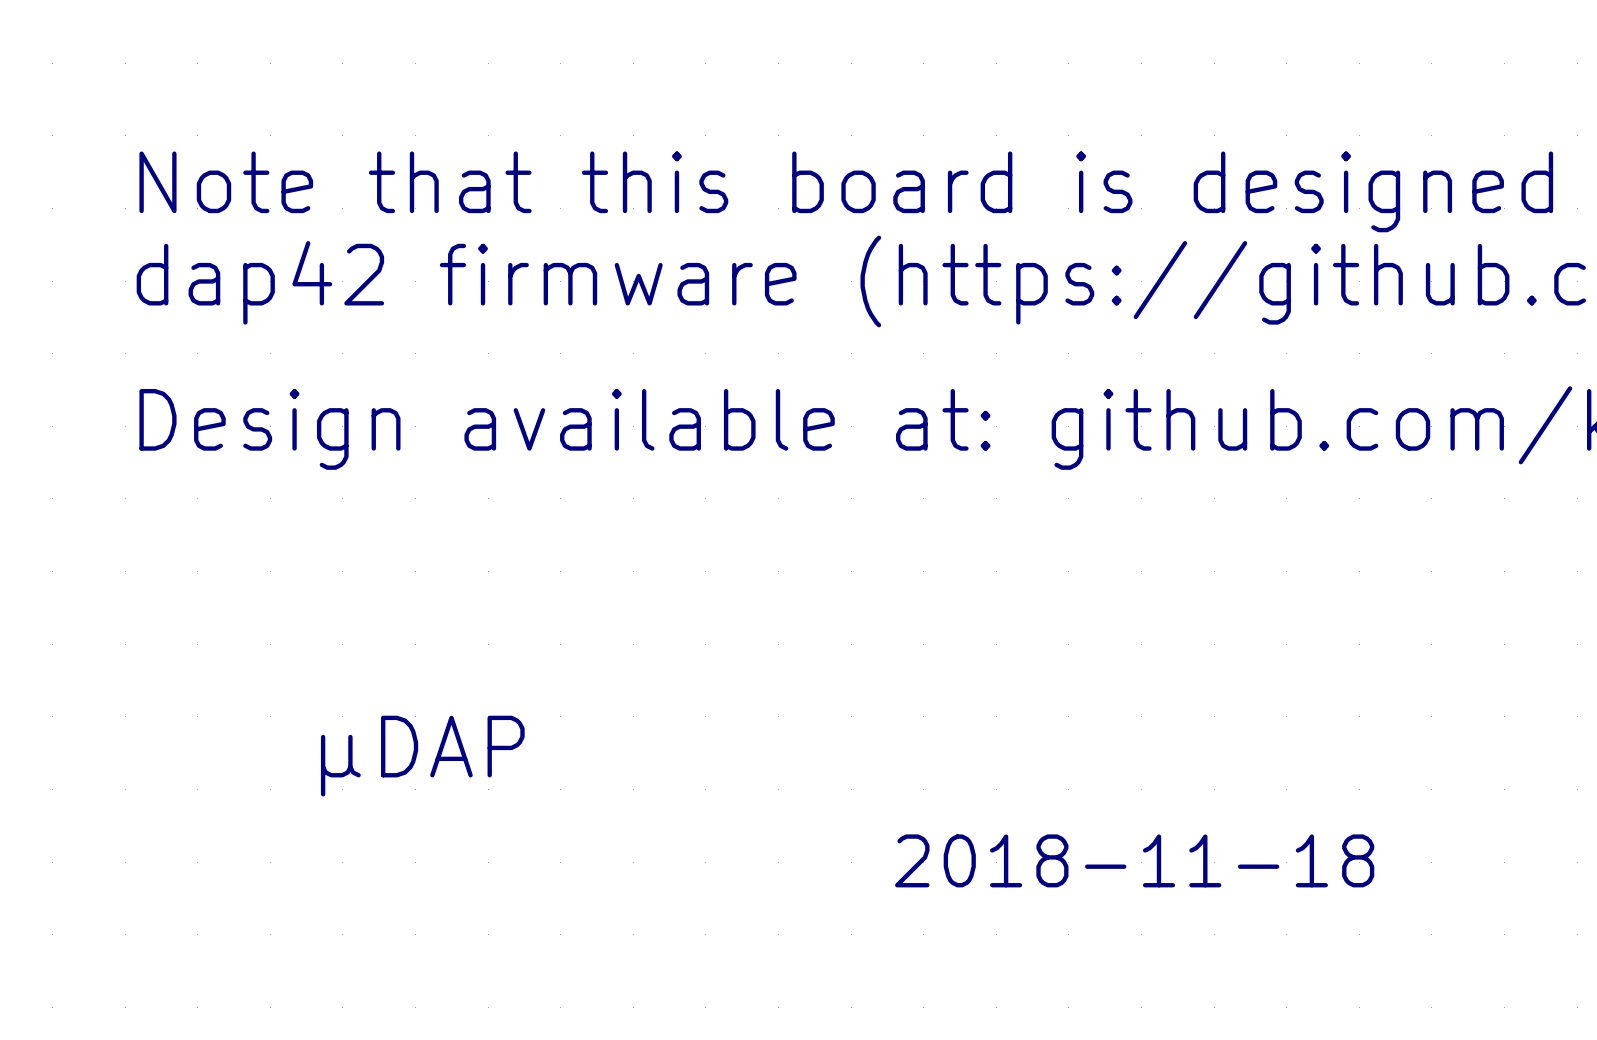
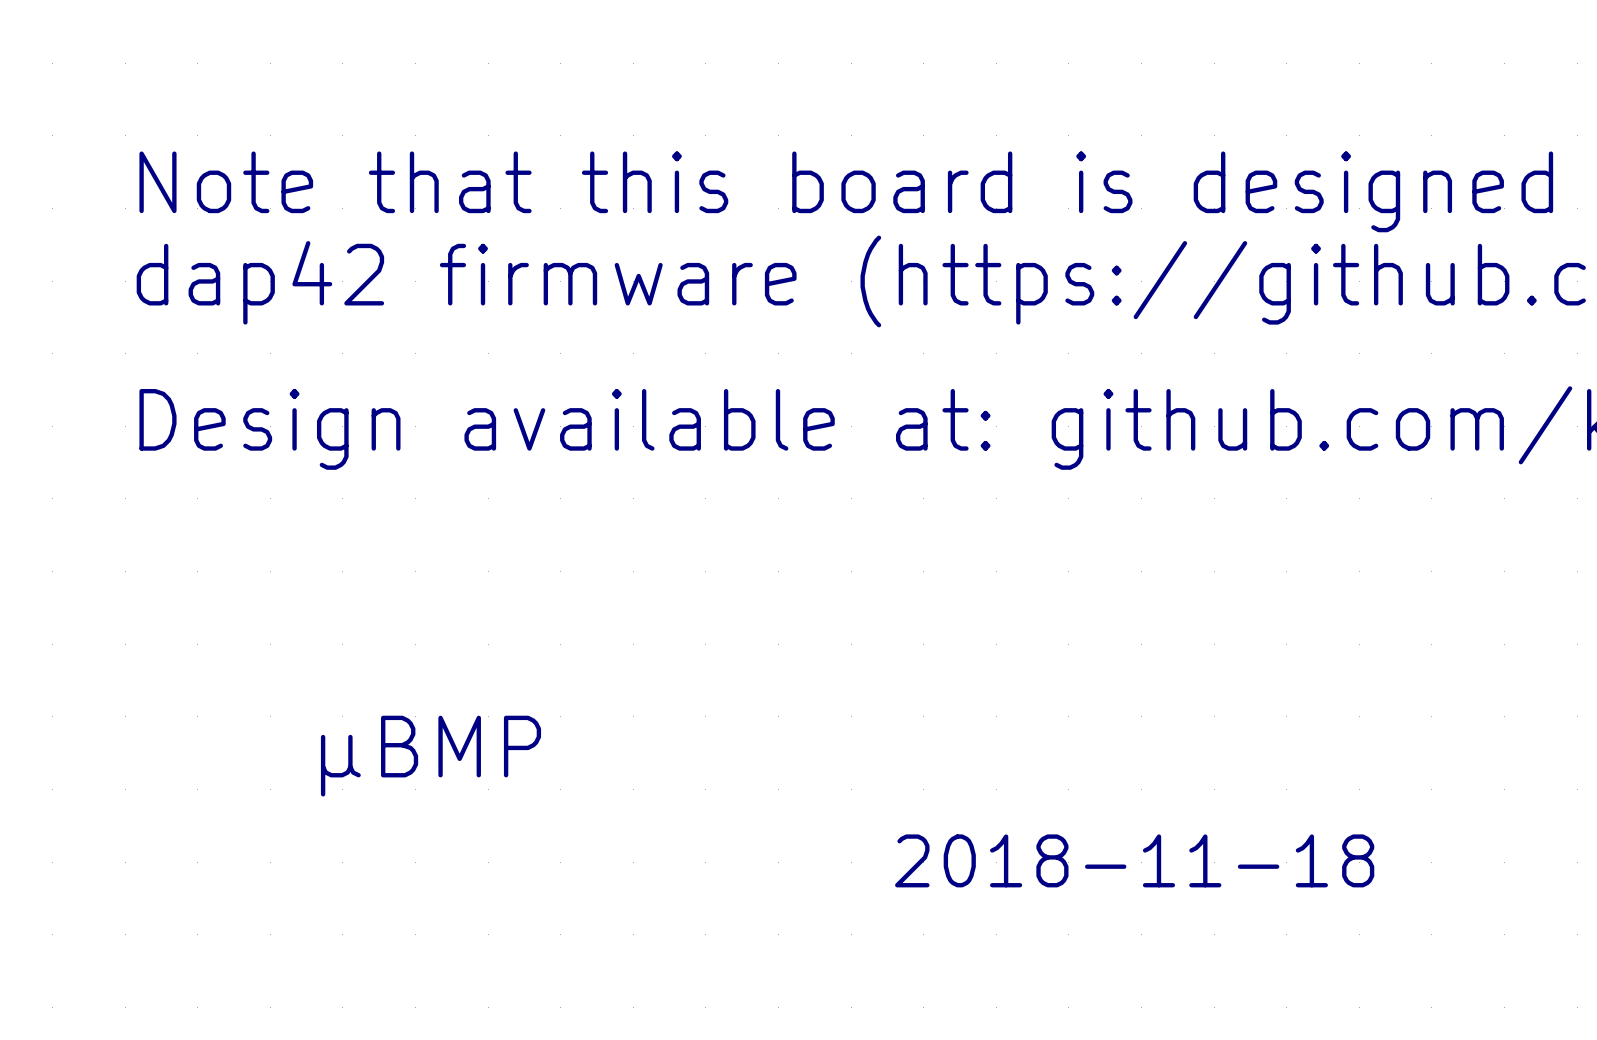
text: µDAP (422, 756) -> µBMP (430, 756)

